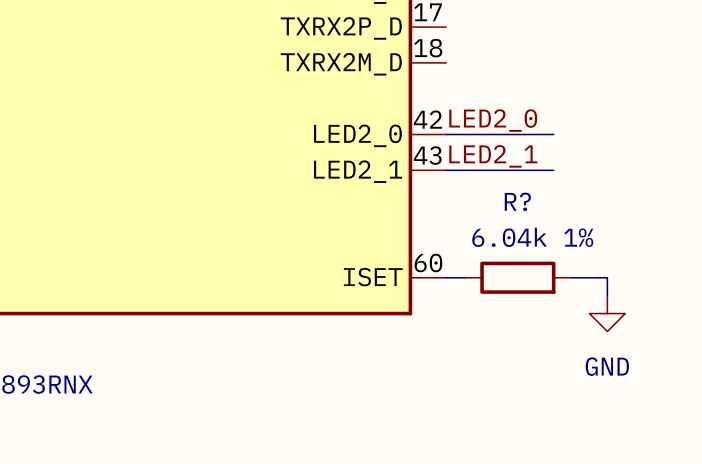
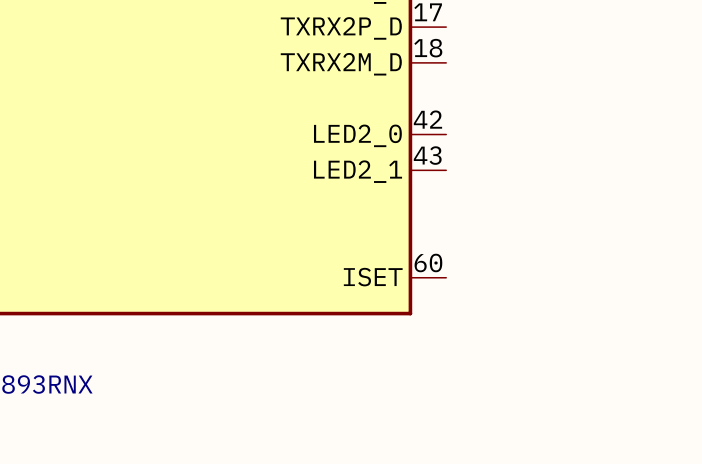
label: LED2_0 (493, 120) -> none
wire: (446, 134) (553, 134) -> none
label: LED2_1 (493, 156) -> none
wire: (446, 170) (553, 170) -> none
wire: (446, 277) (464, 277) -> none
R?: 6.04k 1% (517, 277) -> none
wire: (571, 277) (607, 277) (607, 295) -> none
power symbol: GND (607, 313) -> none

